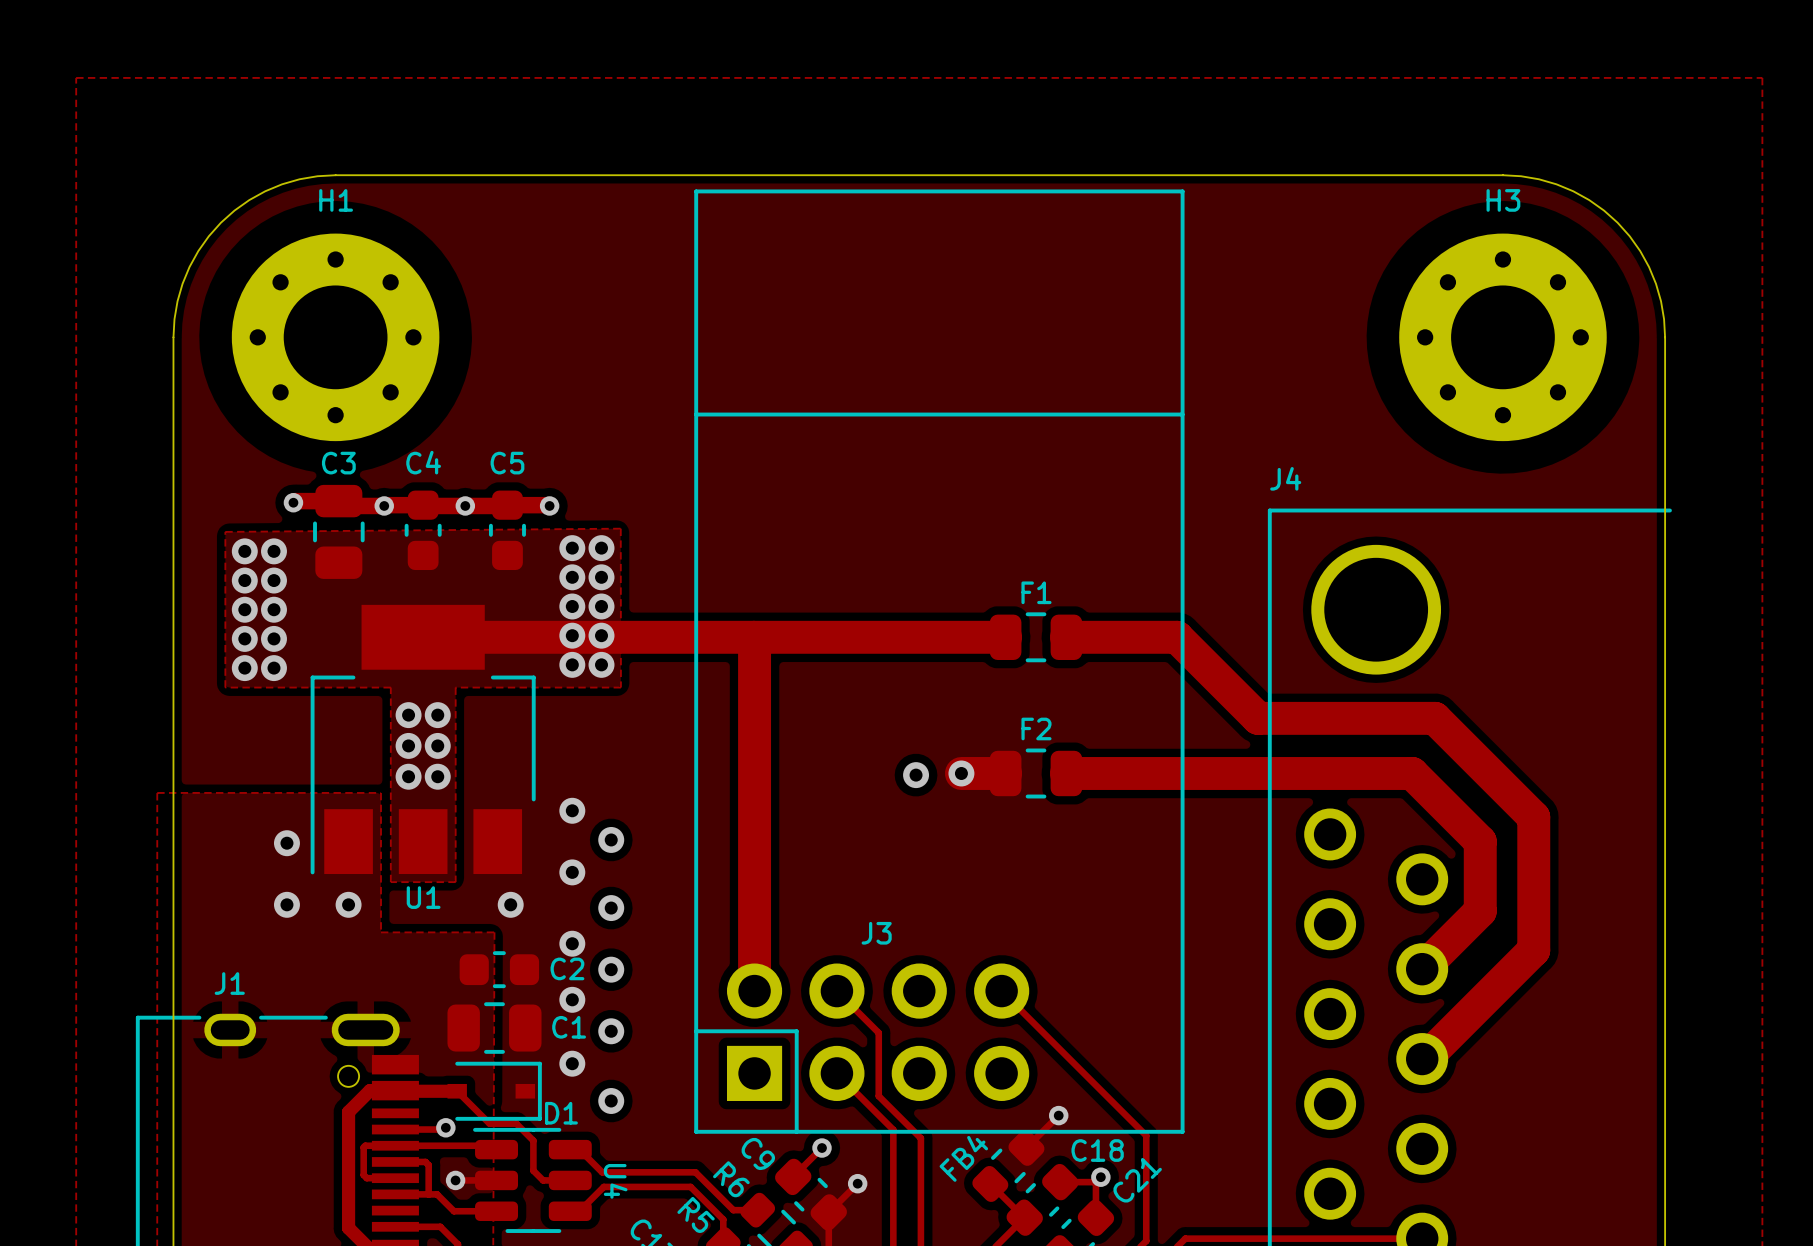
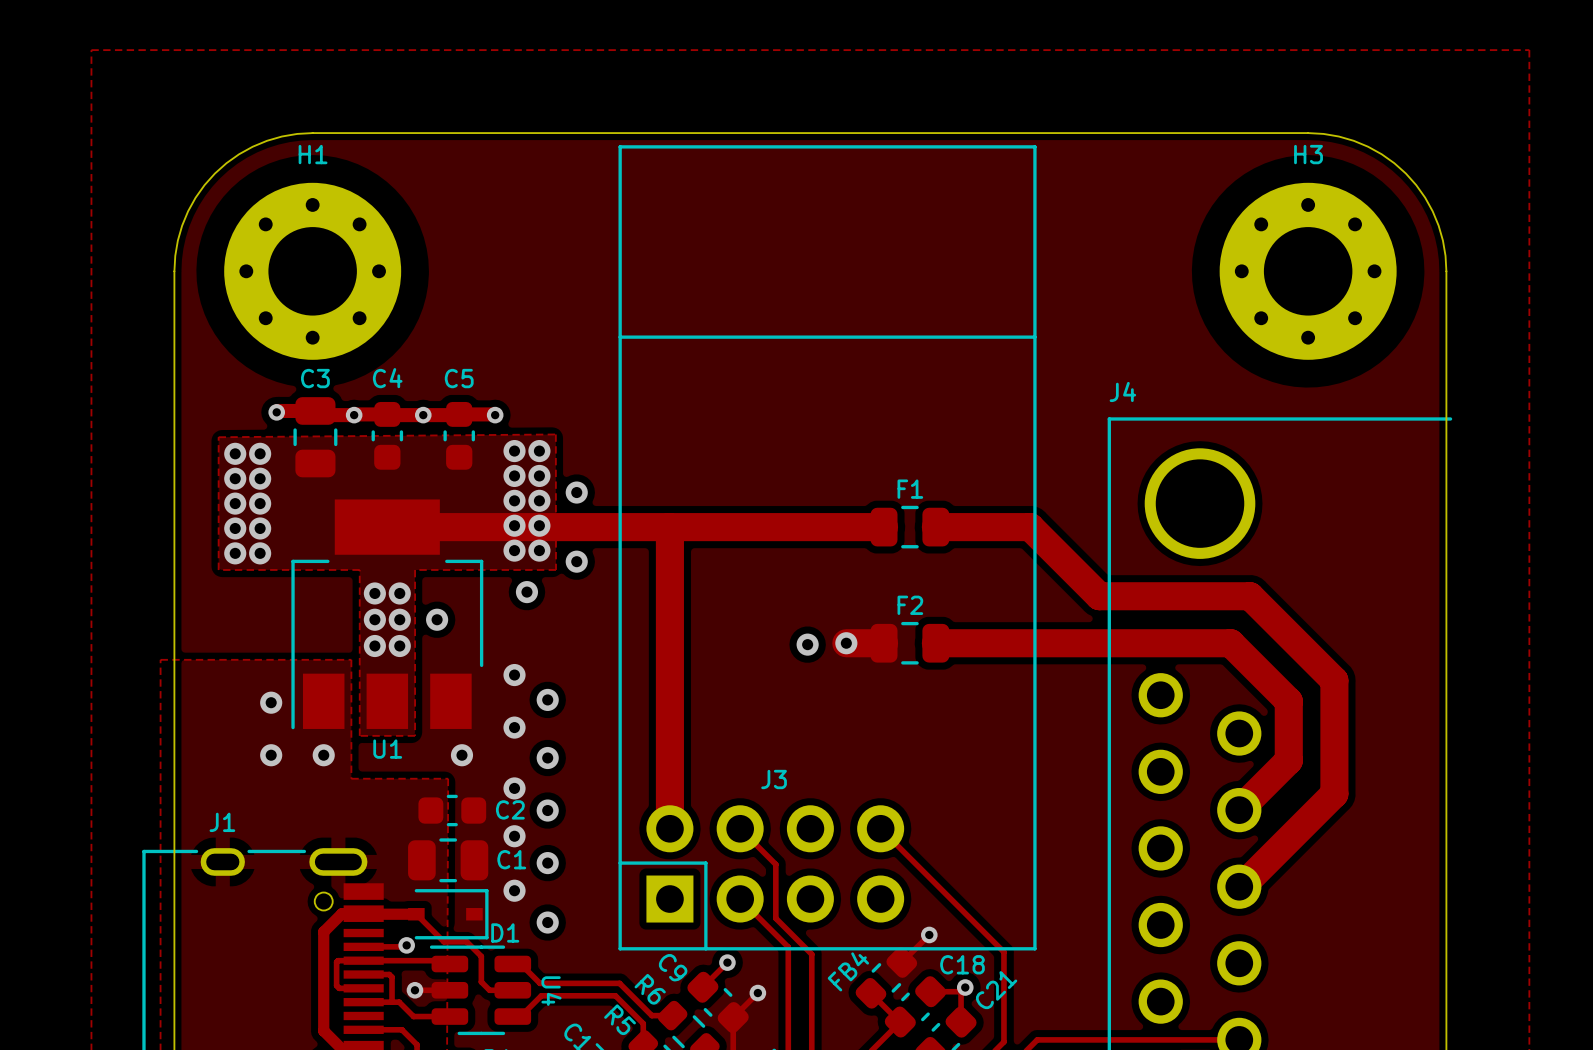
via: none -> (576, 492)
via: none -> (576, 561)
via: none -> (526, 592)
via: none -> (437, 619)

